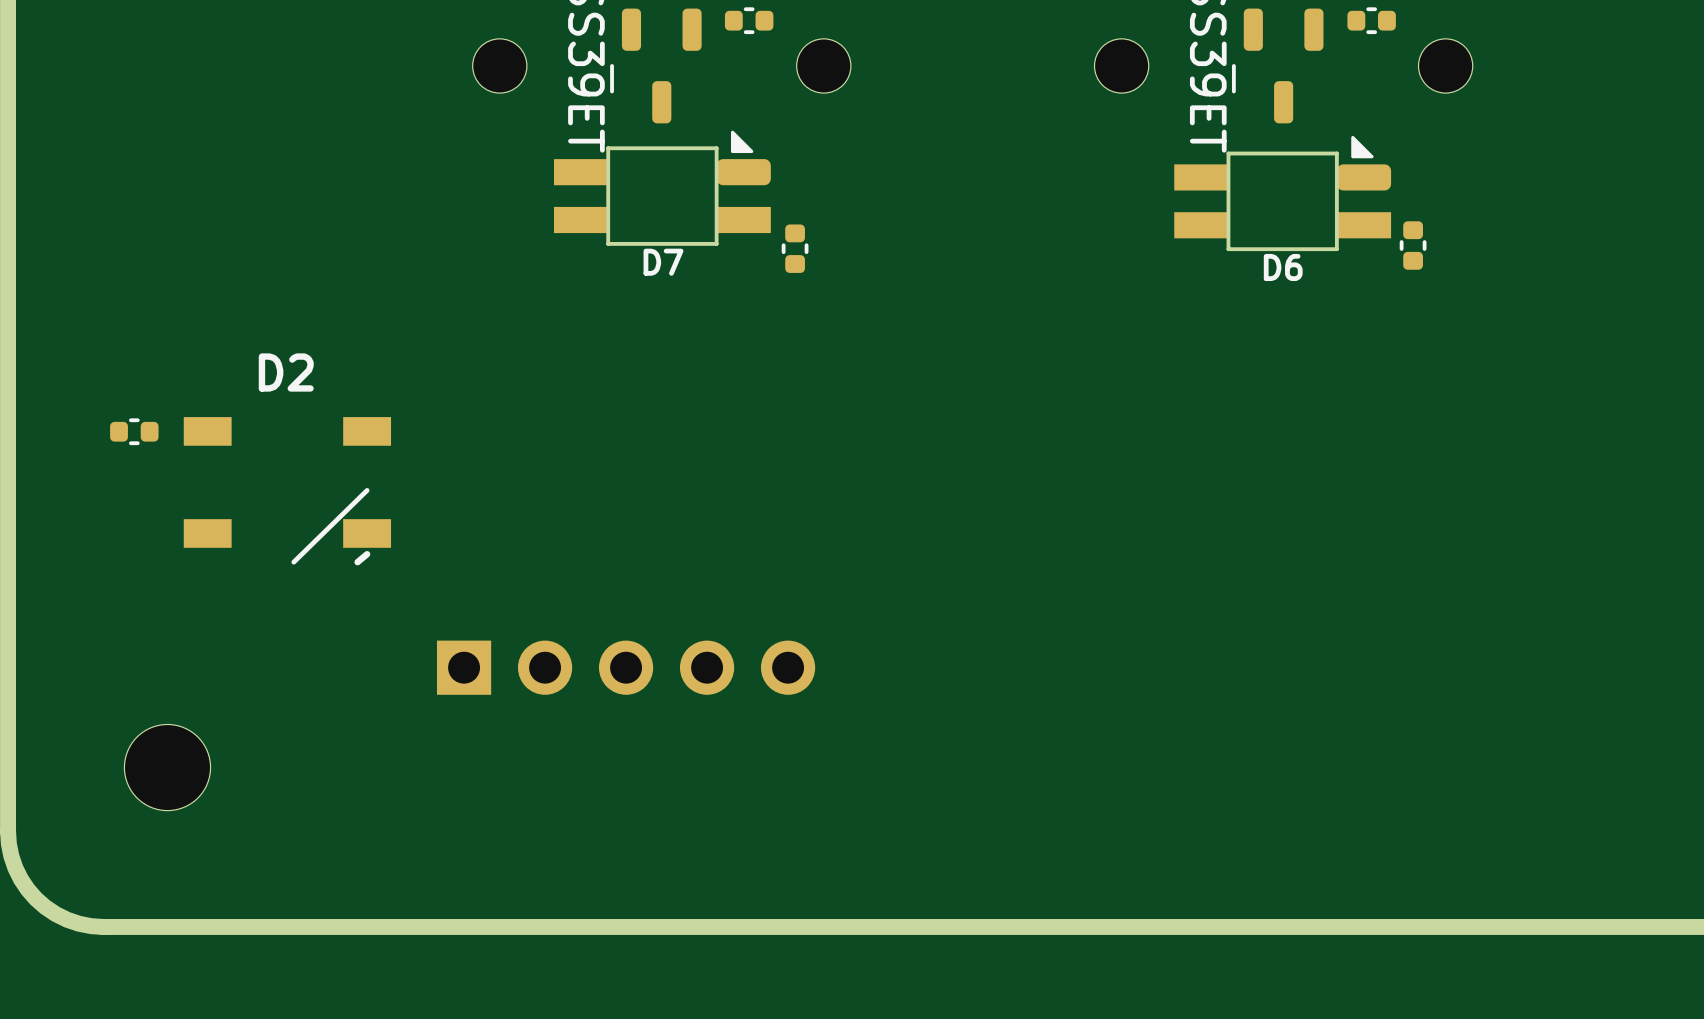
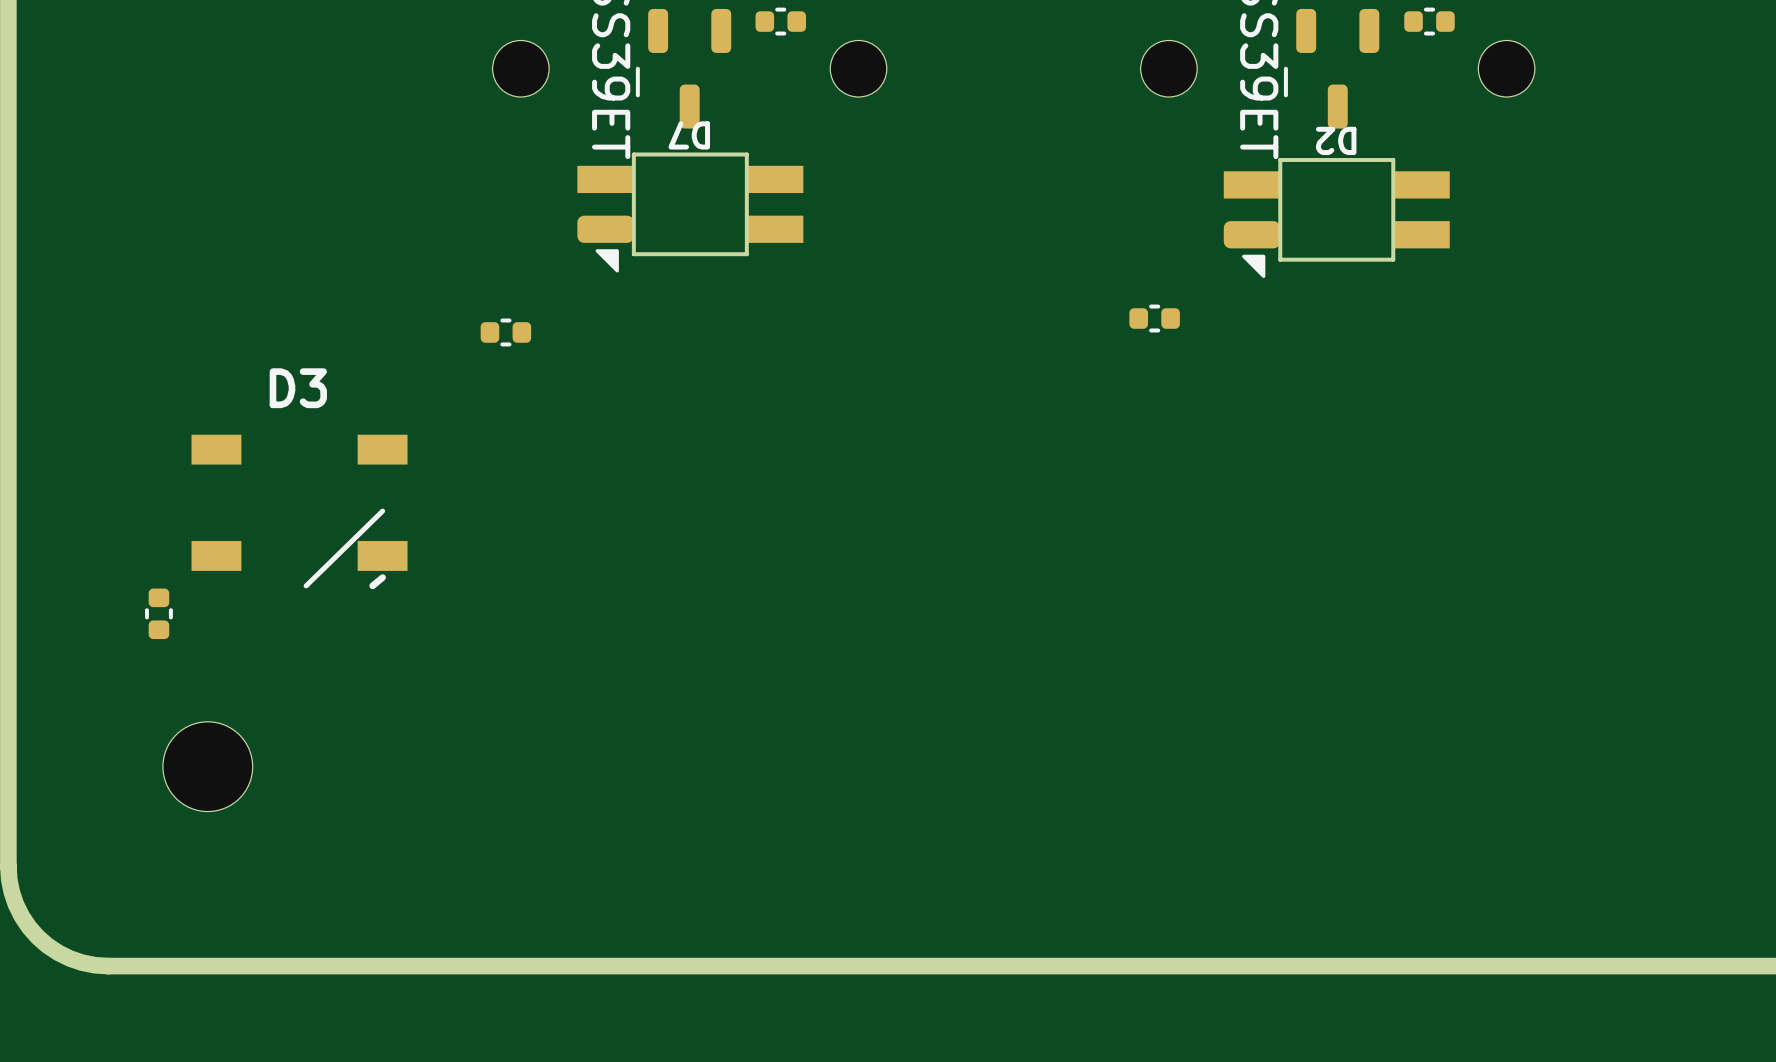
D7 rotation: 0° (662, 188) -> 180° (690, 212)
D6: (1282, 193) -> none
D2: none -> (1336, 217)
part: (1413, 245) -> none
part: (795, 248) -> none
part: none -> (1154, 318)
part: none -> (505, 332)
D2 name: D2 (286, 372) -> D3 (298, 388)
part rotation: 0° (134, 431) -> 90° clockwise (158, 613)
part position: (134, 431) -> (158, 613)
part: (626, 667) -> none
part position: (167, 767) -> (207, 766)

